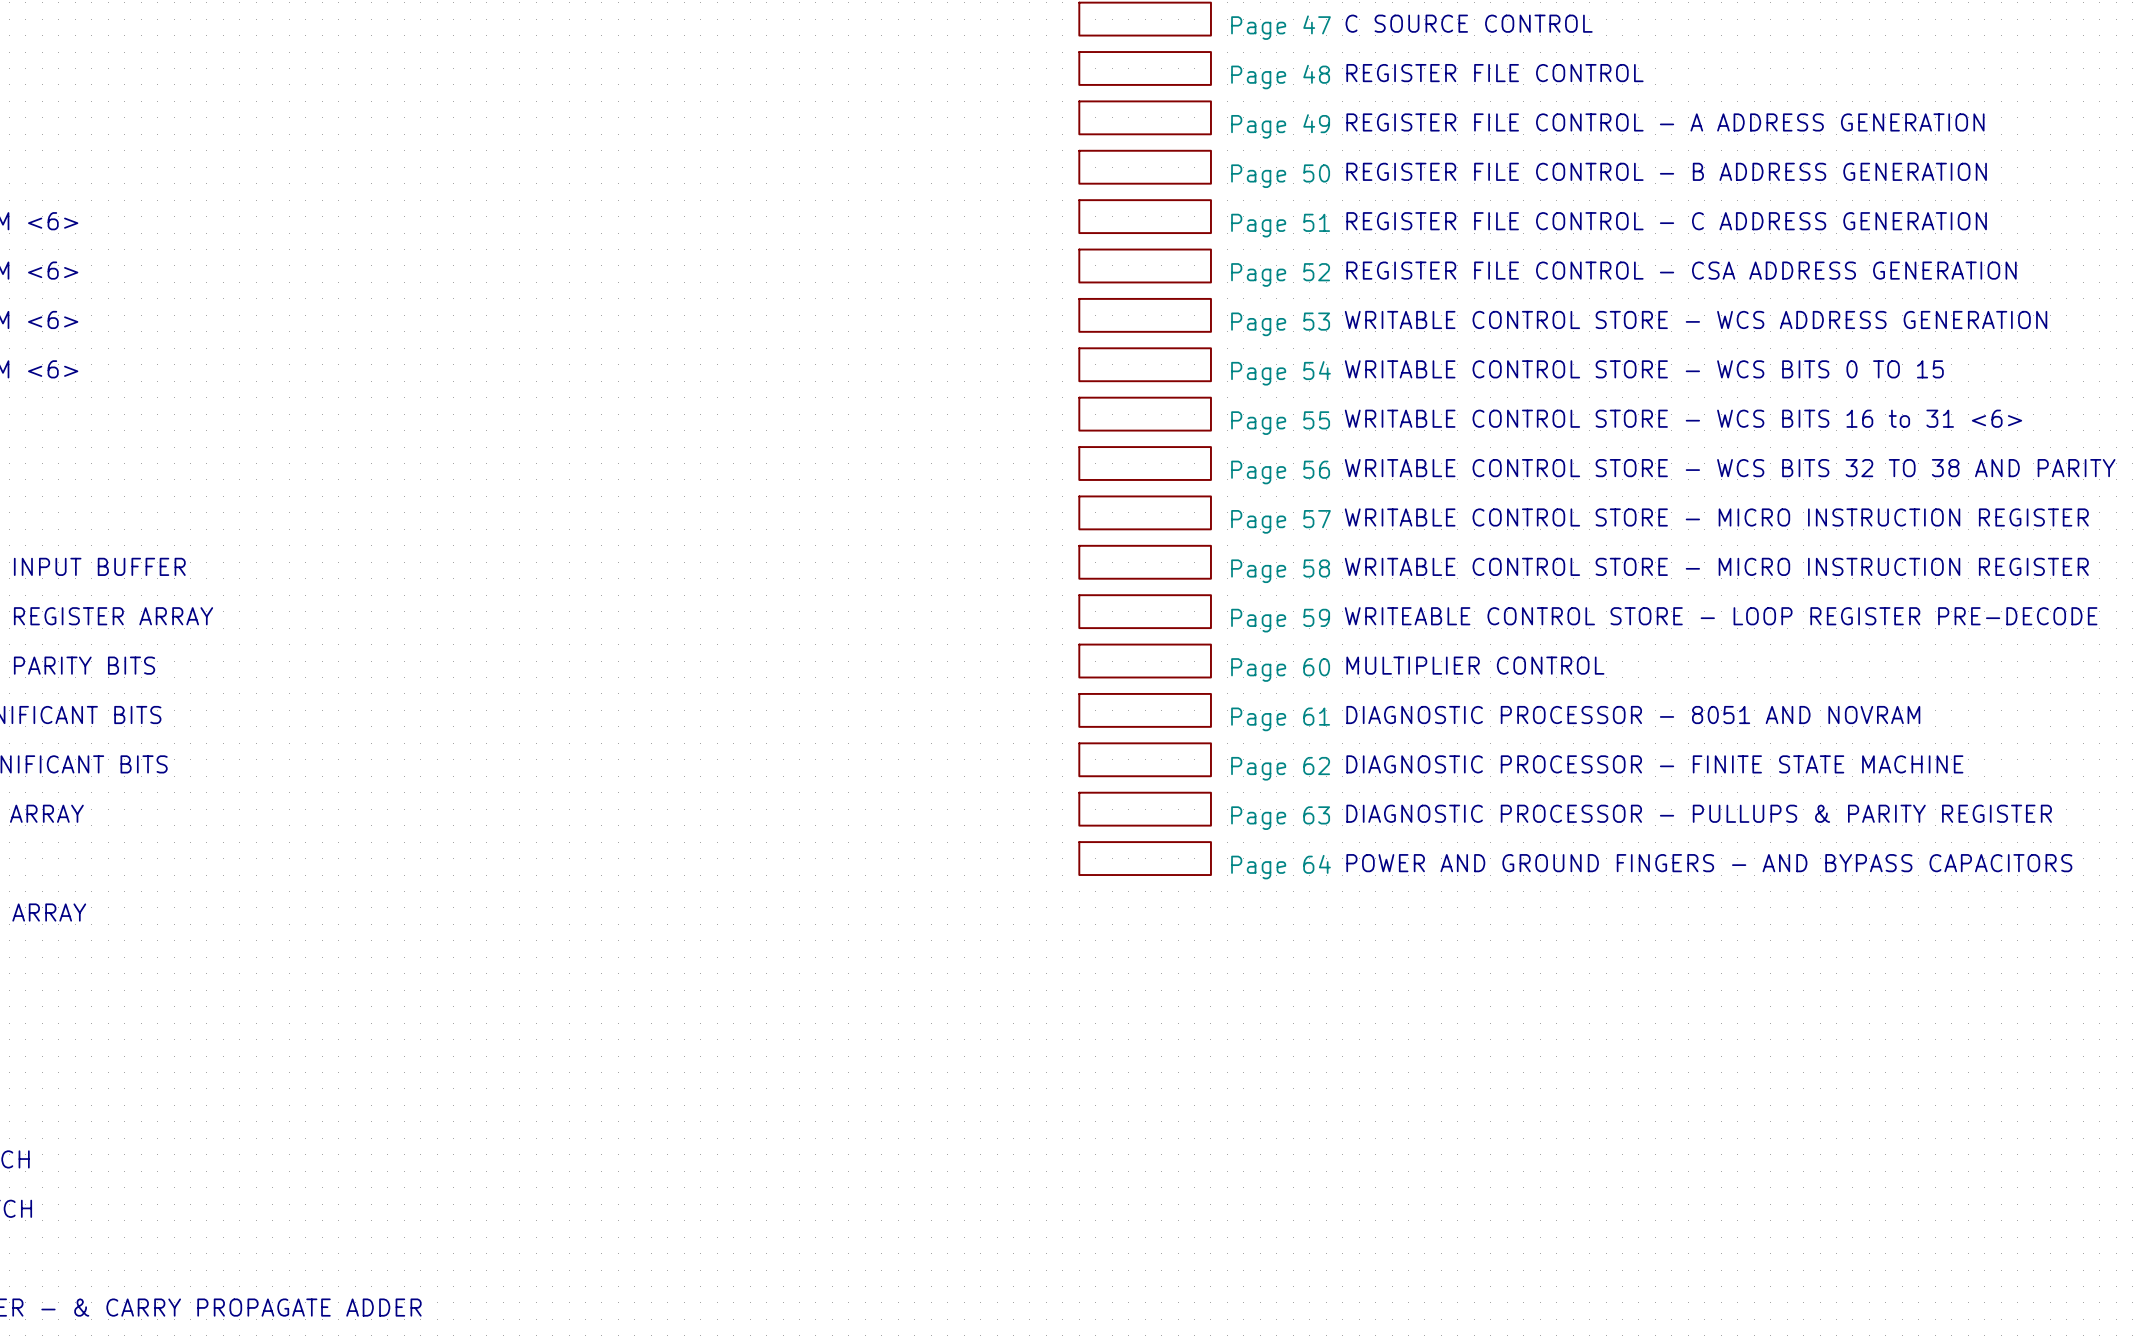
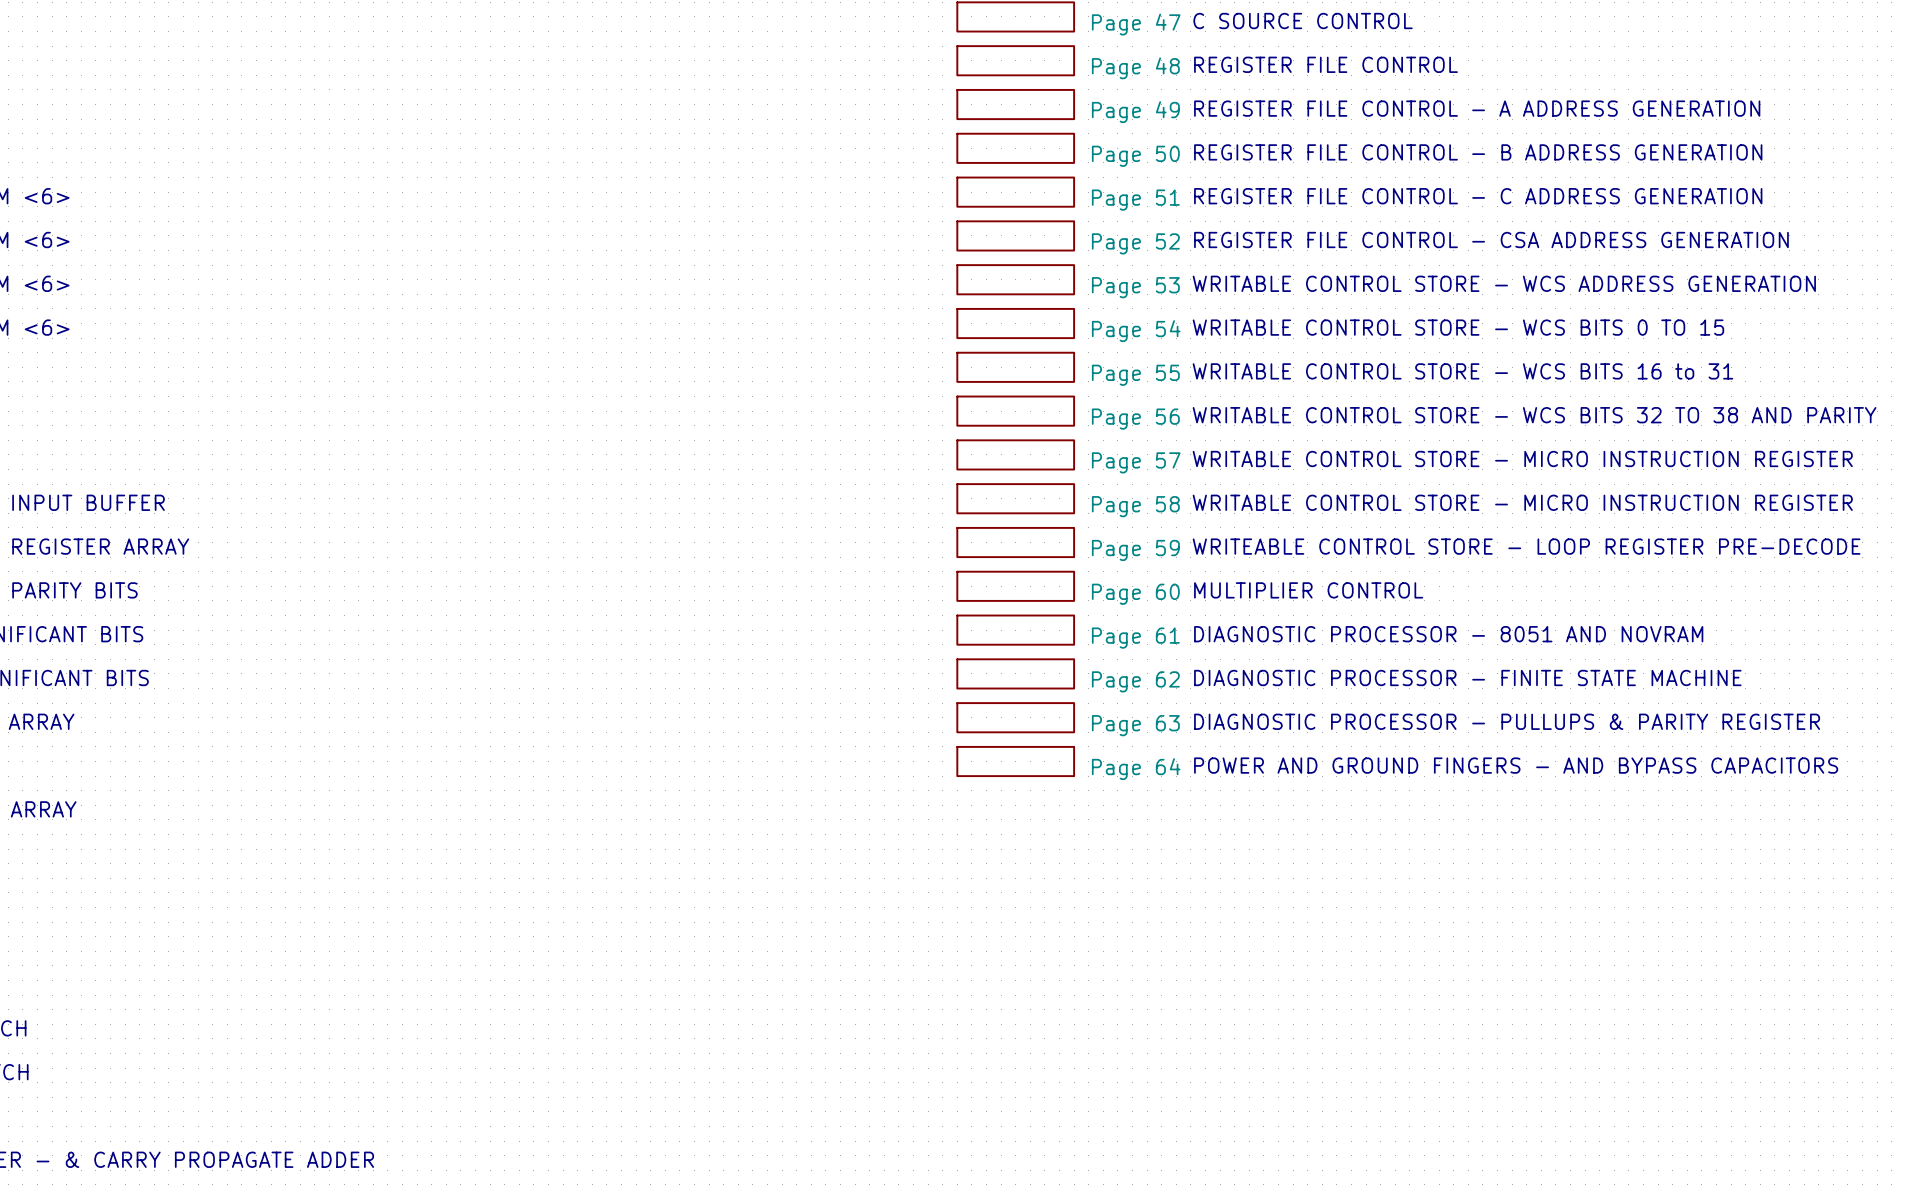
text: WRITABLE CONTROL STORE - WCS BITS 16 to 31 <6> (1683, 418) -> WRITABLE CONTROL STORE - WCS BITS 16 to 31 (1462, 371)

